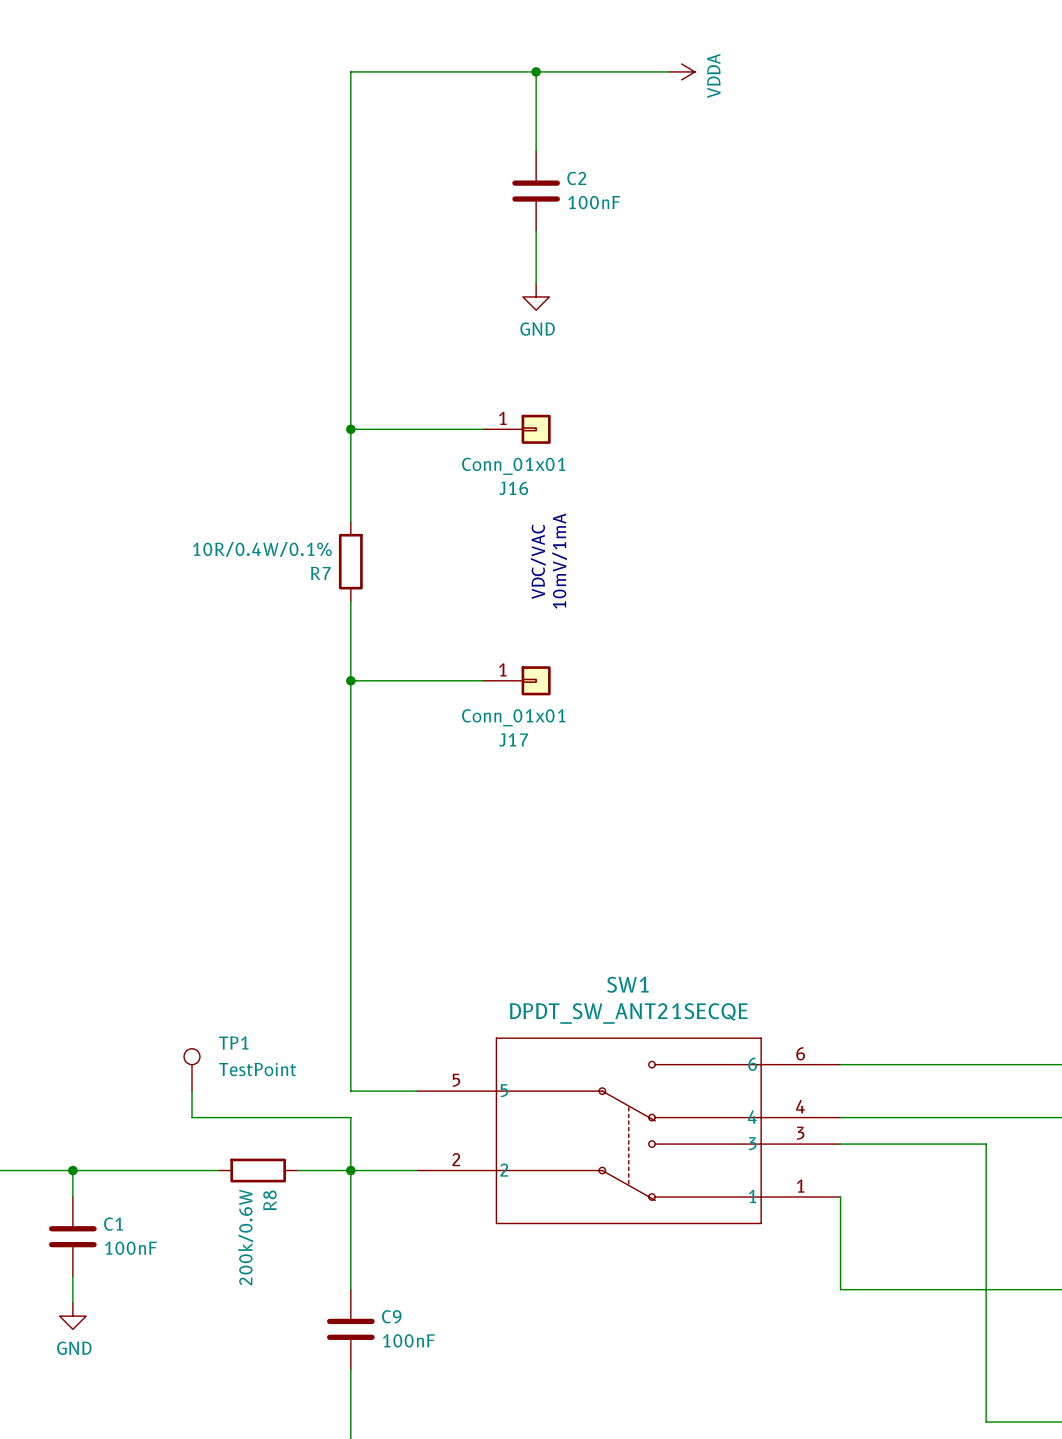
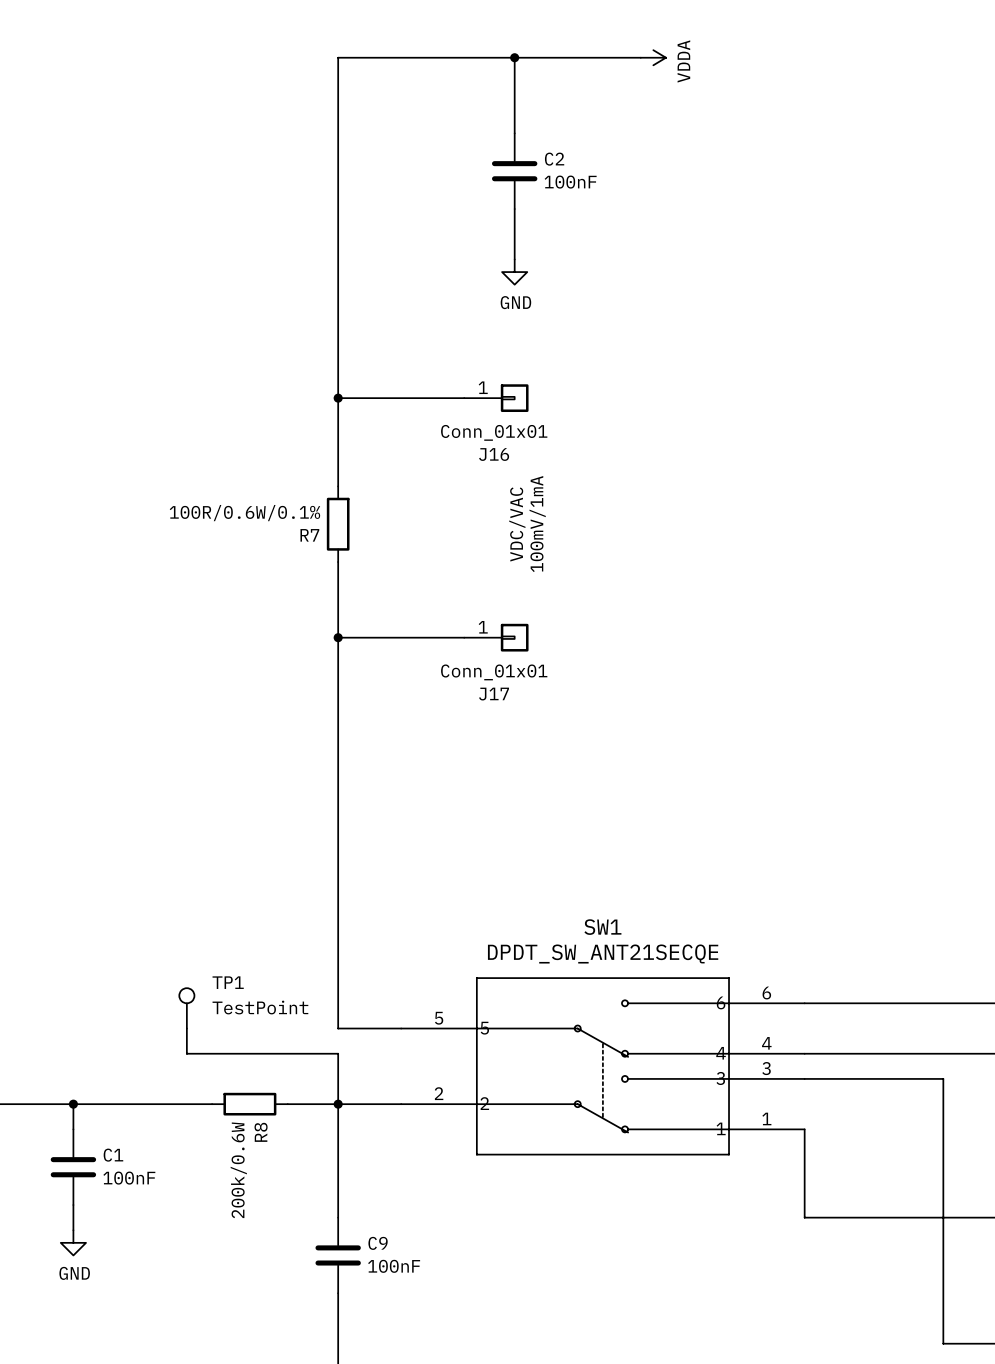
R7 value: 10R/0.4W/0.1% (262, 549) -> 100R/0.6W/0.1% (244, 513)
text: 10mV/1mA (559, 561) -> 100mV/1mA (537, 524)

